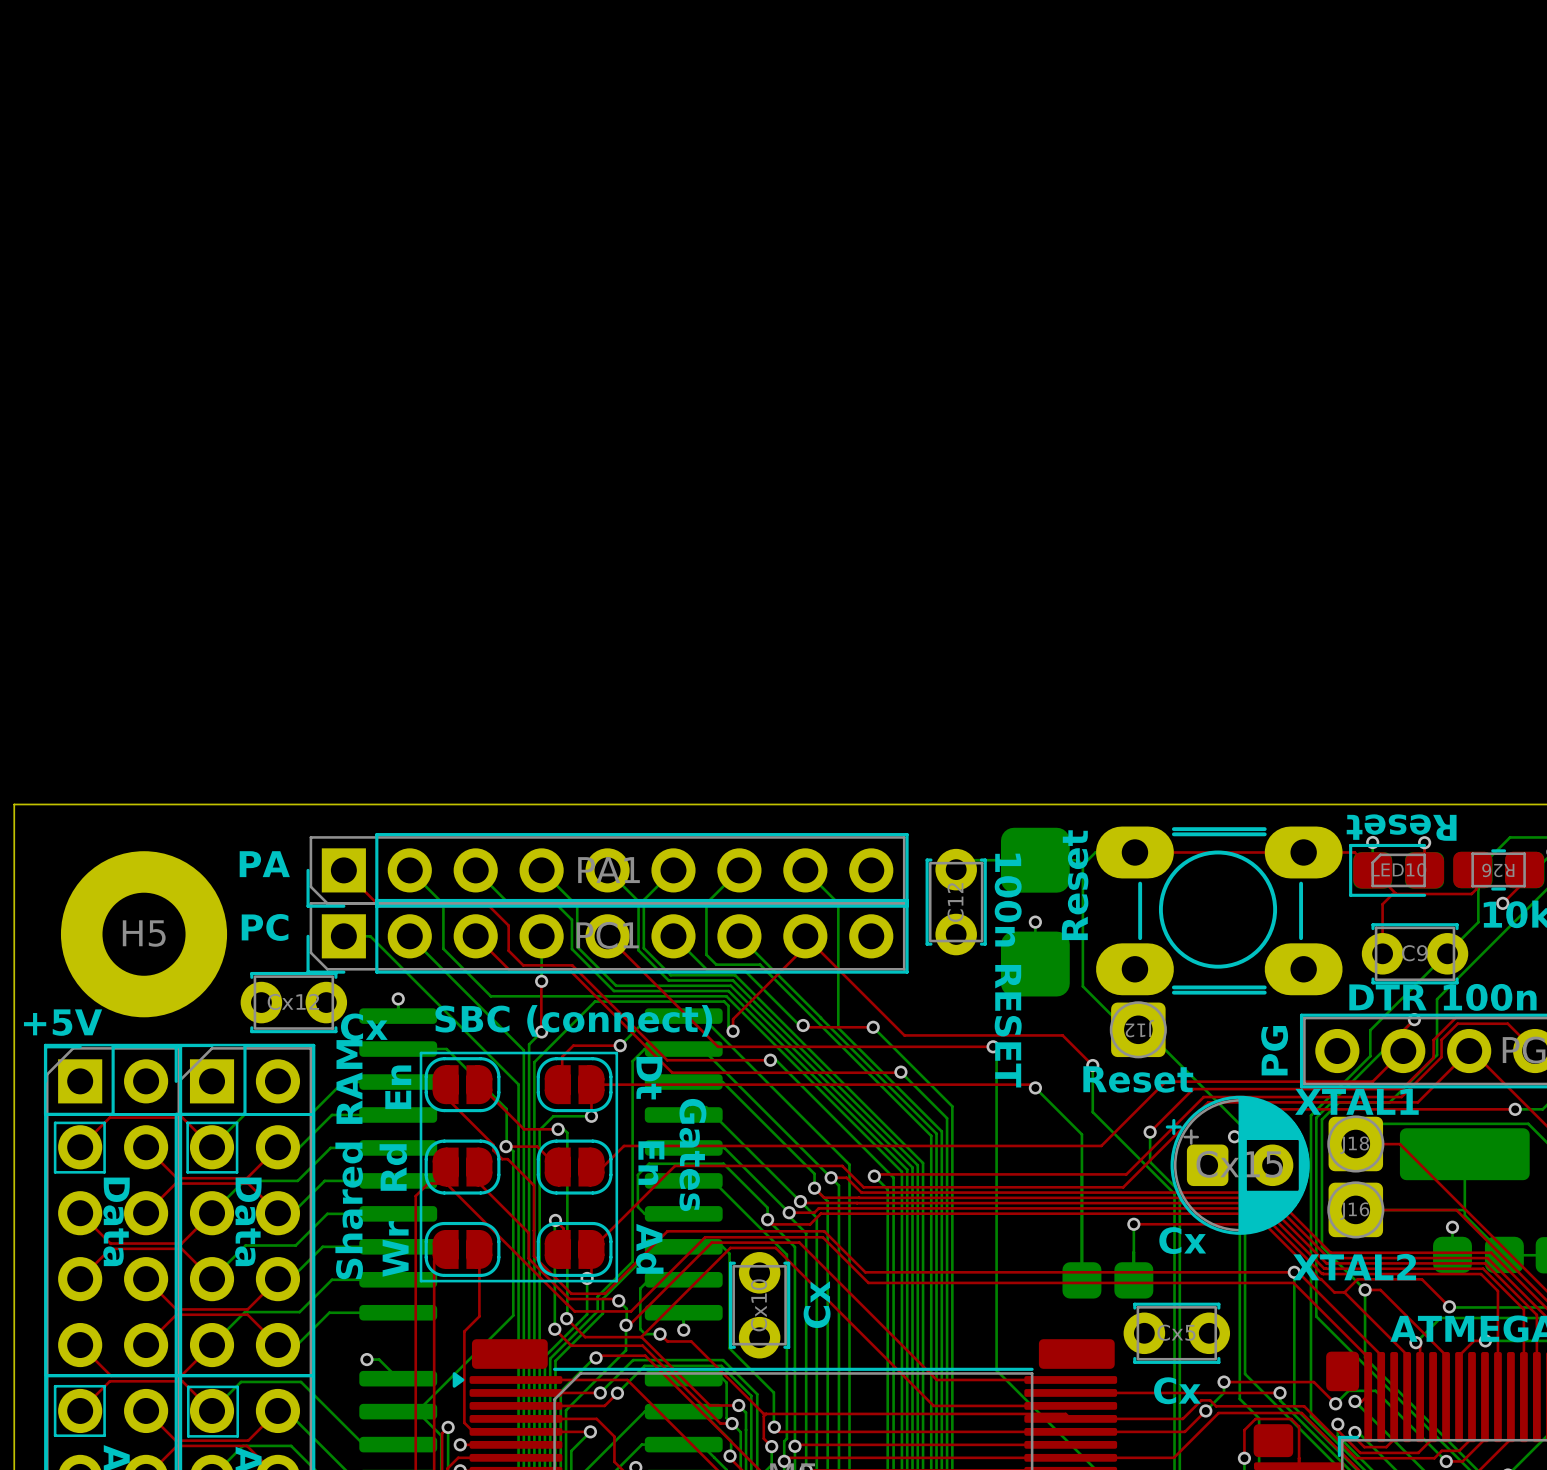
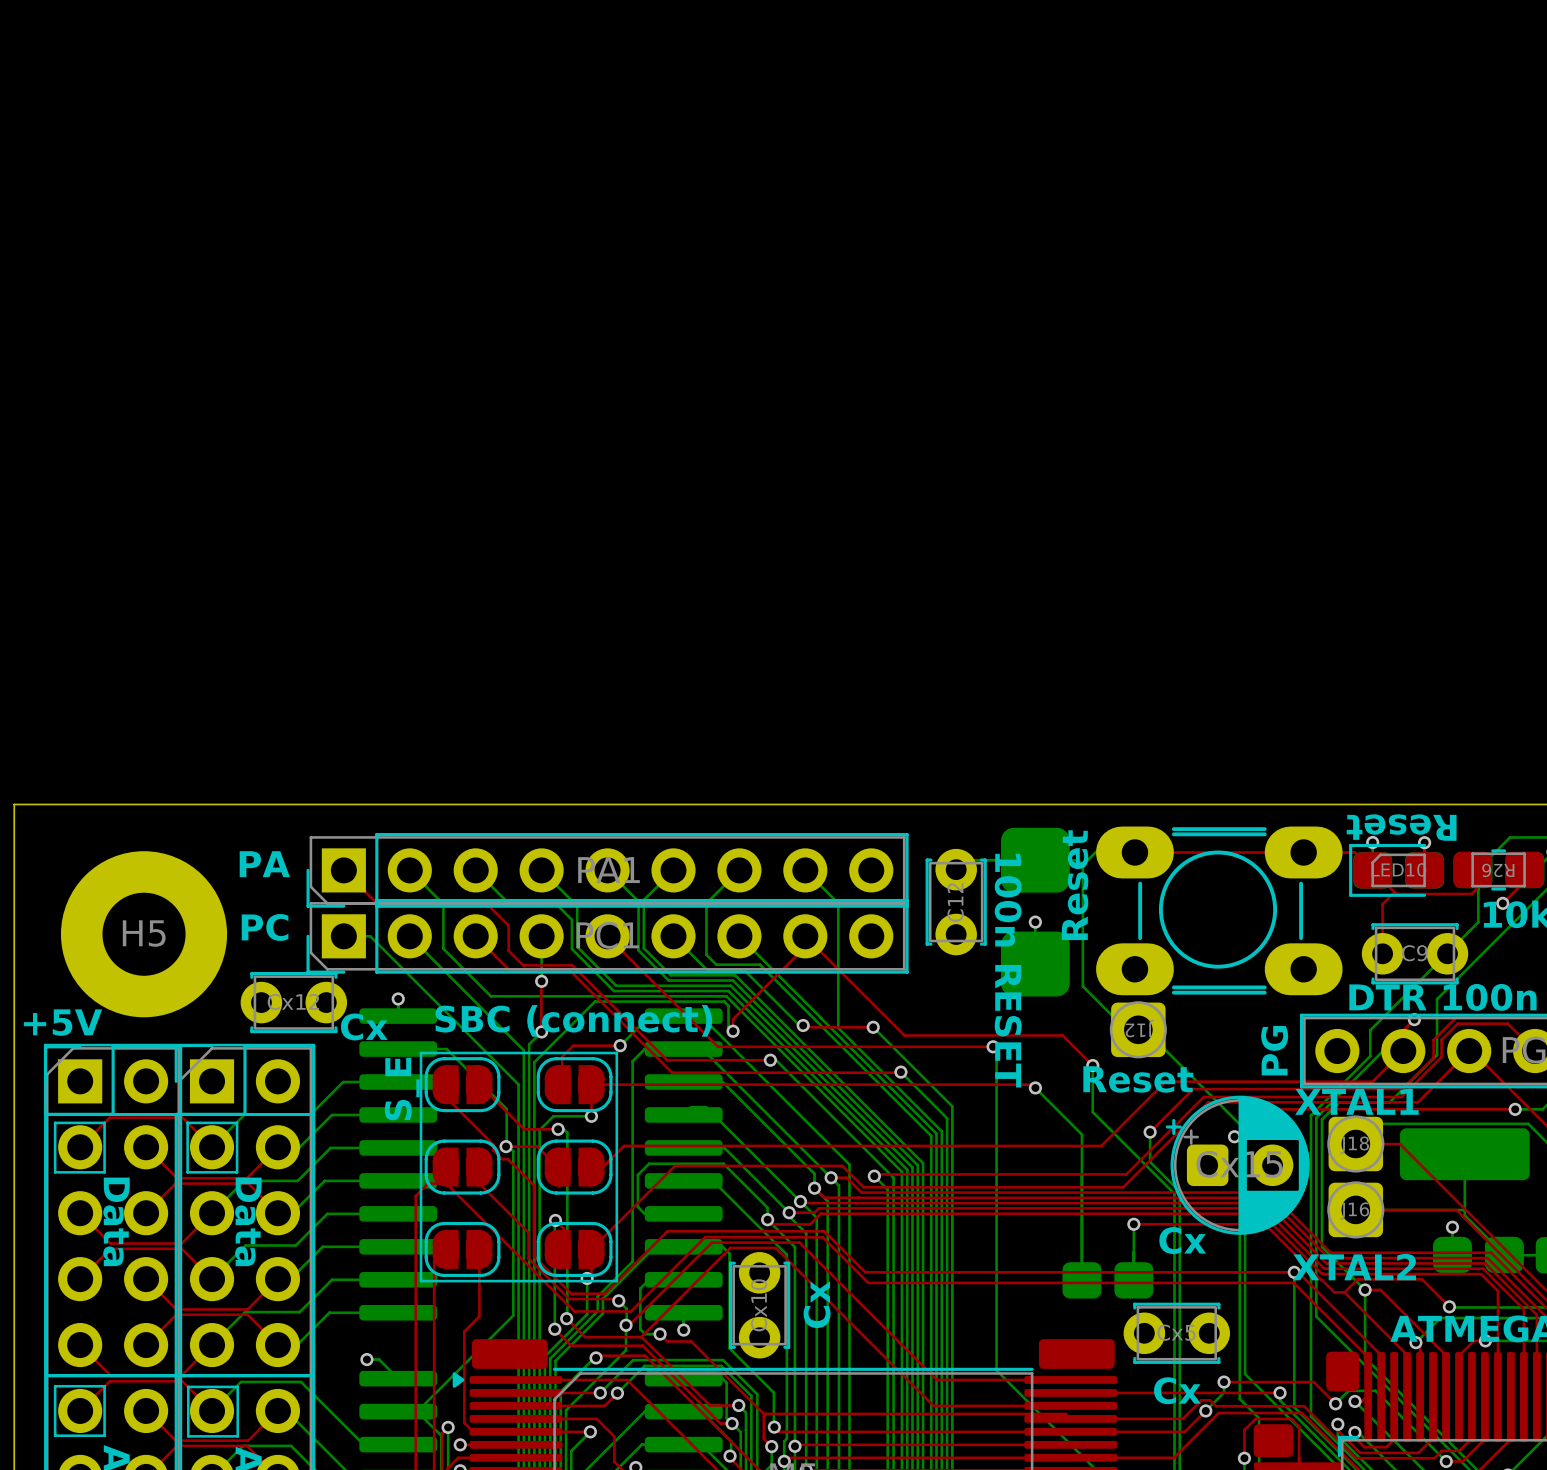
text: Dt (649, 1078) -> none
text: En (398, 1087) -> S_E (402, 1089)
text: Gates (692, 1155) -> none
text: Shared RAM (349, 1159) -> none
text: En (651, 1163) -> none
text: Rd (393, 1167) -> none
text: Wr (395, 1248) -> none
text: Ad (649, 1248) -> none

